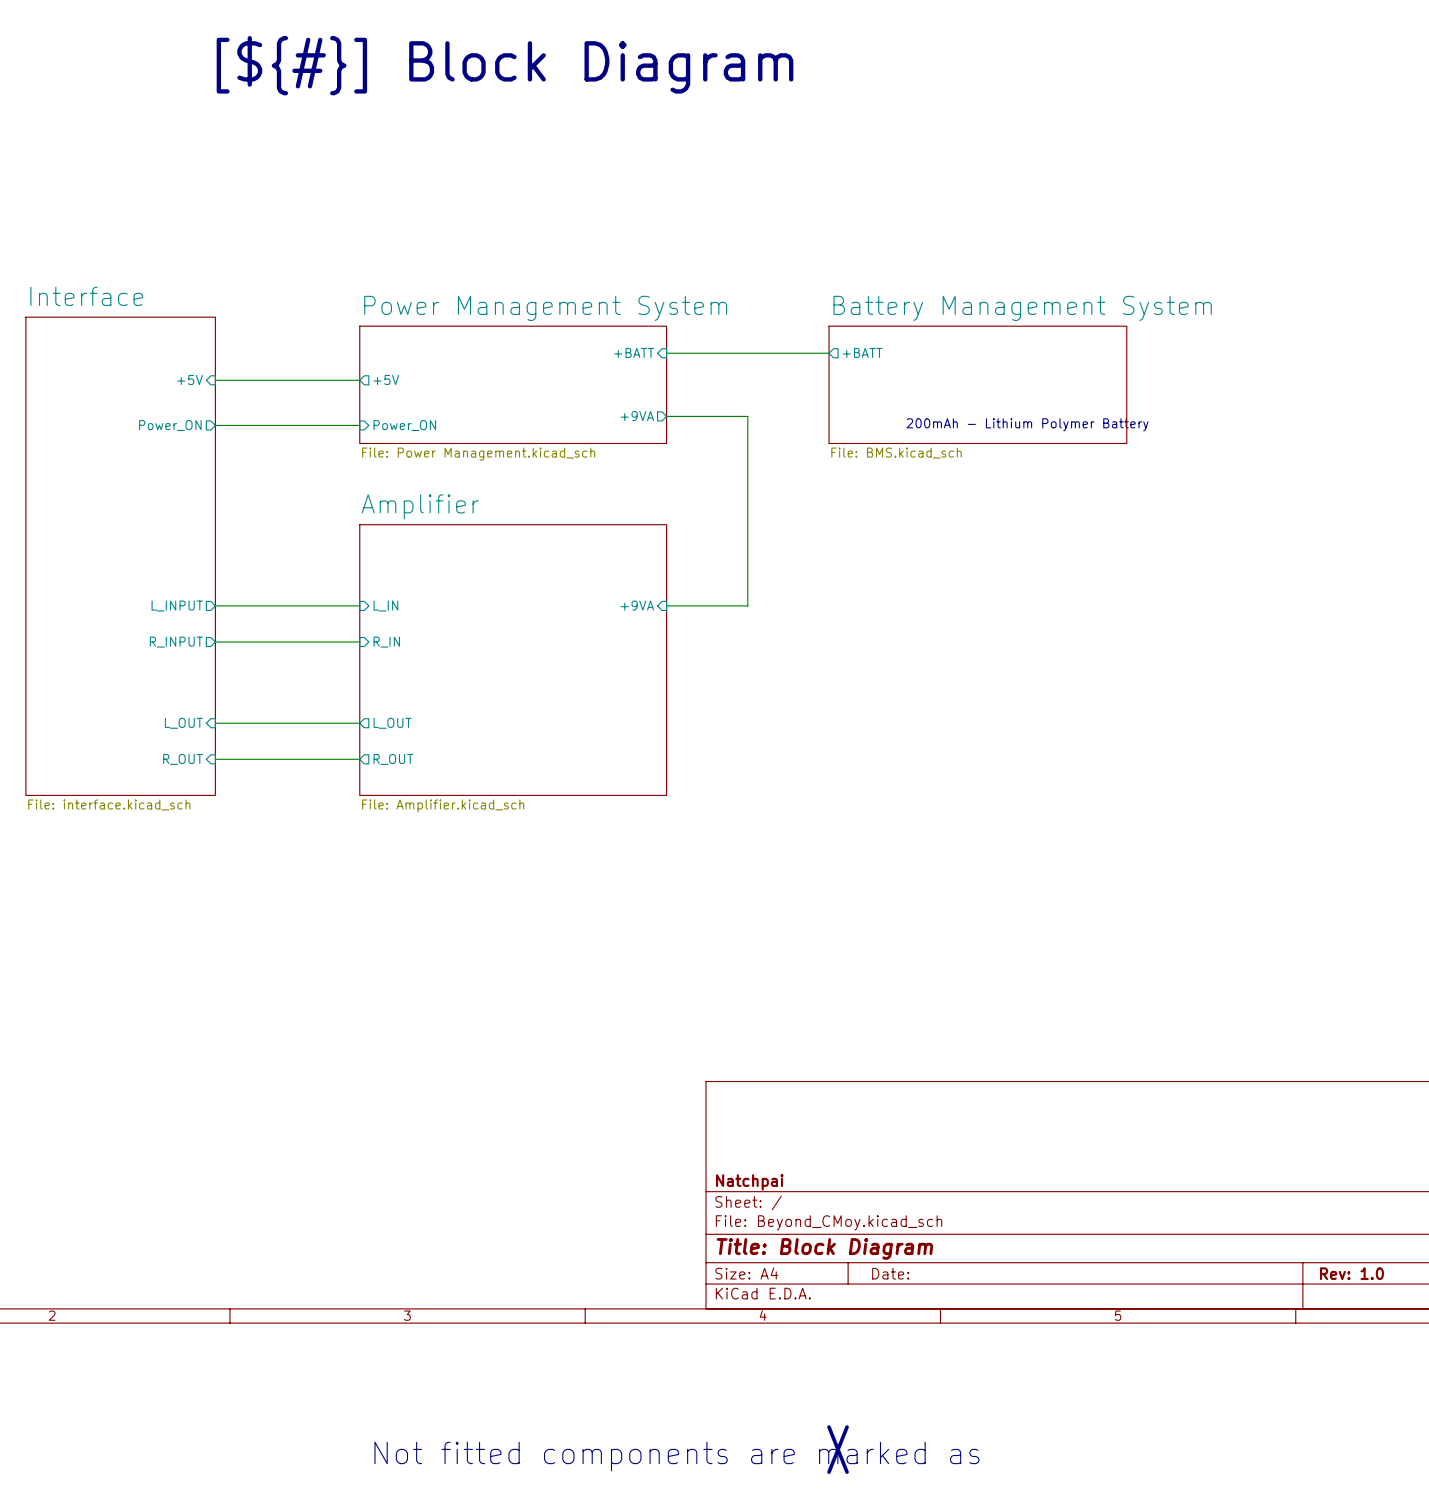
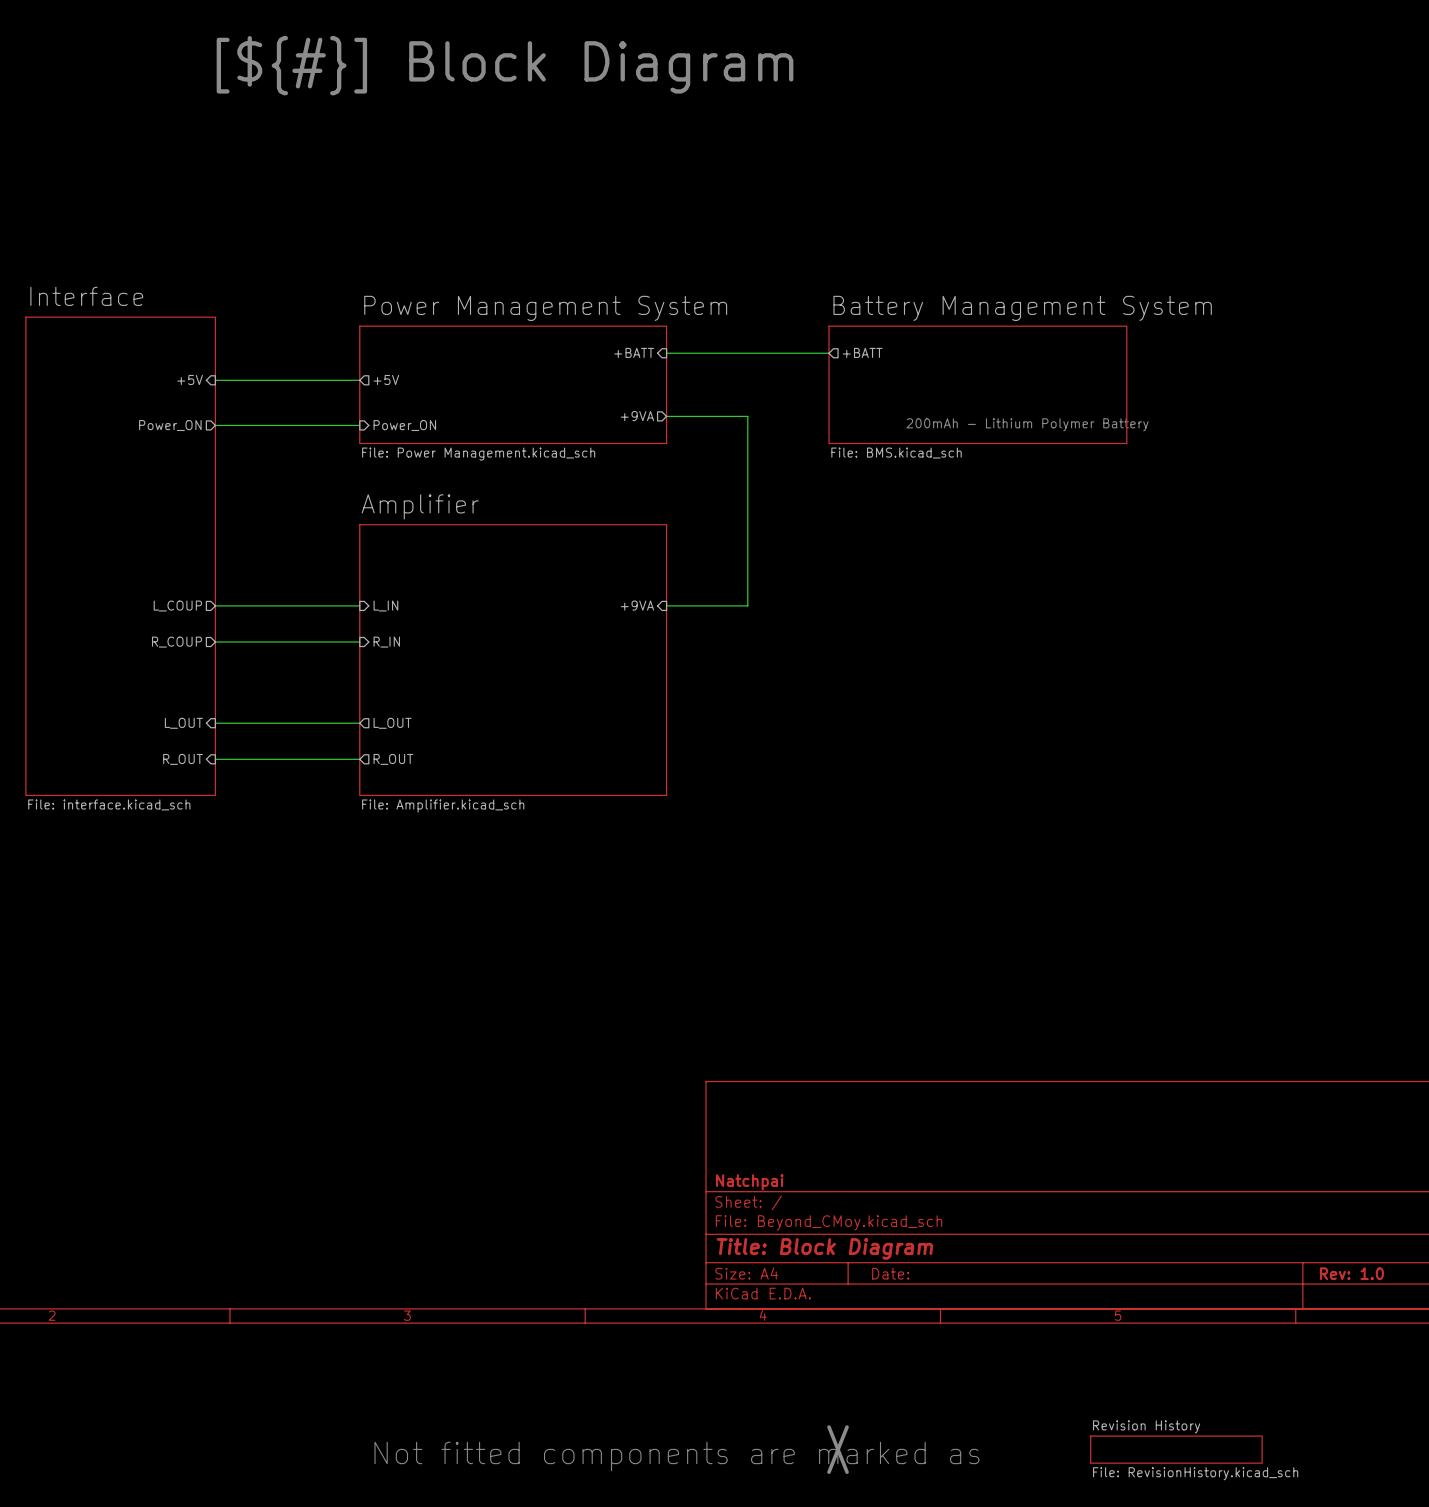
sheet pin: L_INPUT (177, 606) -> L_COUP (177, 606)
sheet pin: R_INPUT (176, 642) -> R_COUP (177, 642)
sheet Revision History: none -> File: RevisionHistory.kicad_sch (1176, 1449)

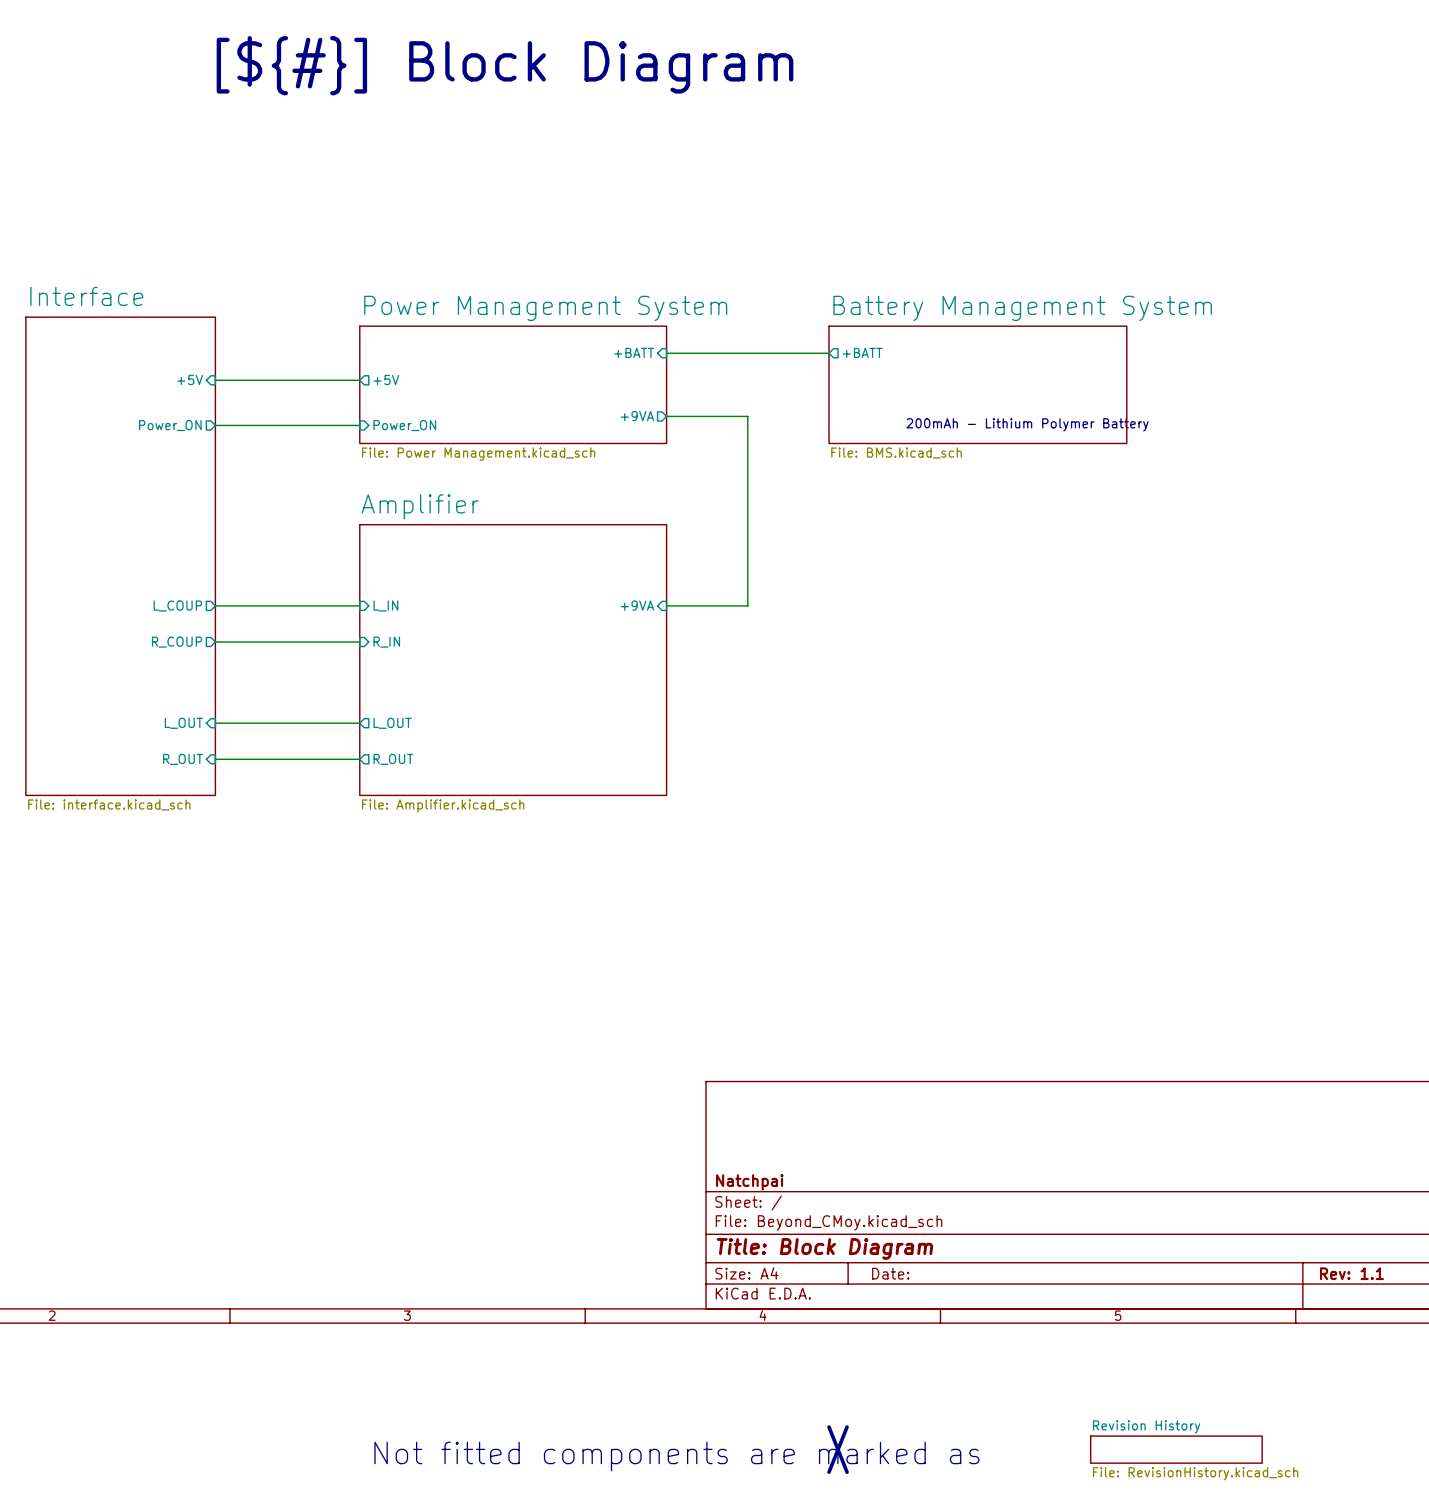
title block: Rev: 1.0 (1351, 1273) -> Rev: 1.1 (1351, 1273)

